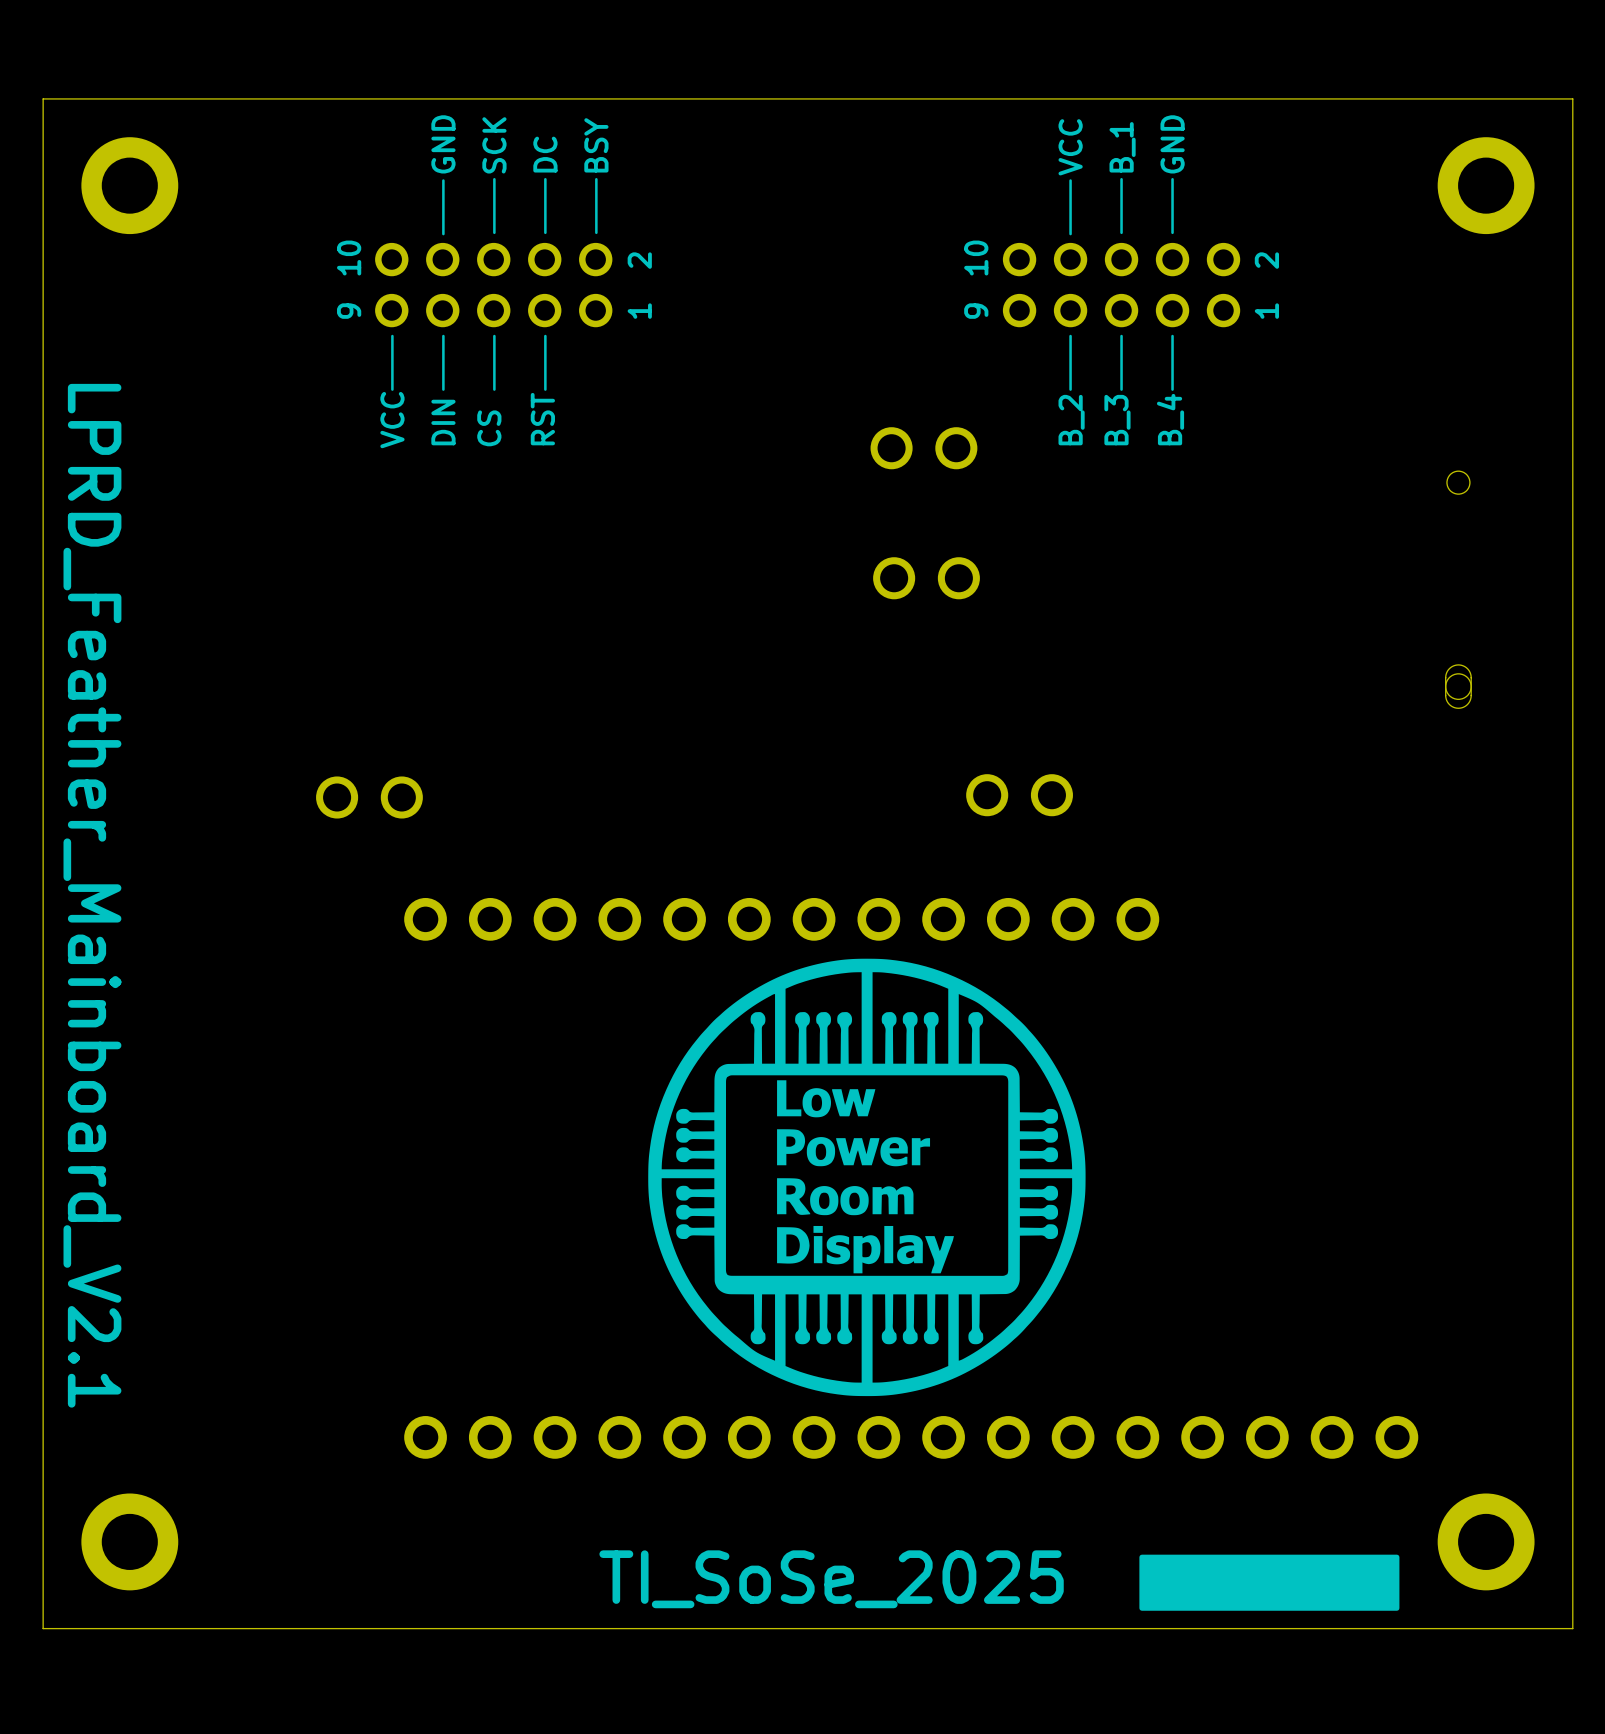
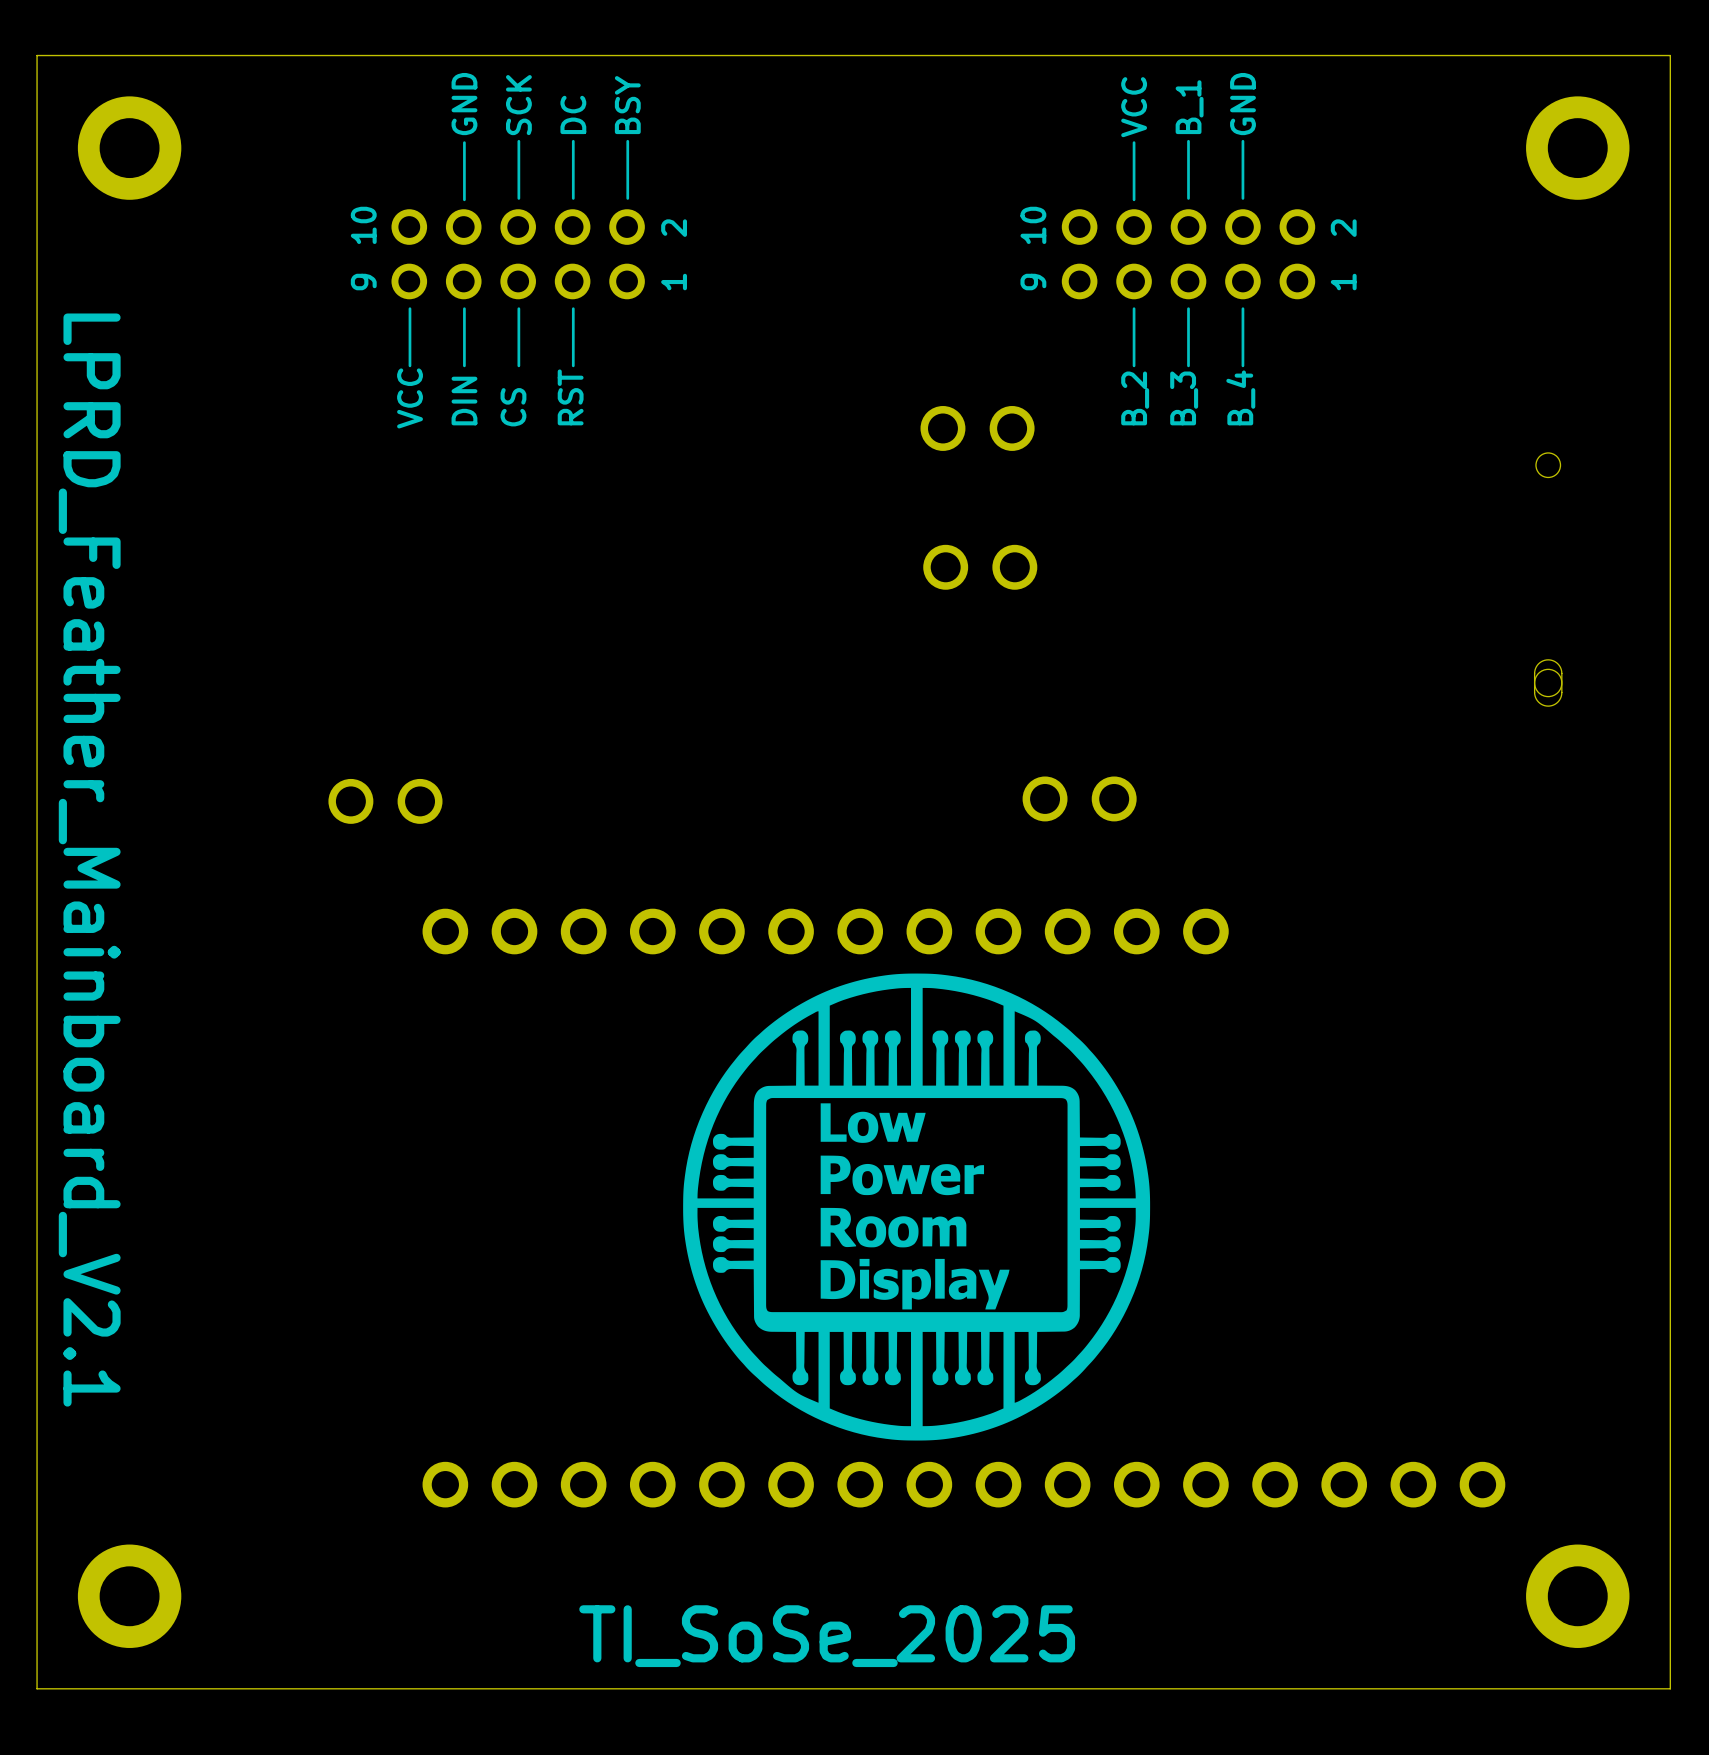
text position: LPRD_Feather_Mainboard_V2.1 (92, 895) -> LPRD_Feather_Mainboard_V2.1 (89, 860)
drawing: [1139, 1554, 1400, 1611] -> none
text position: TI_SoSe_2025 (831, 1579) -> TI_SoSe_2025 (827, 1636)

